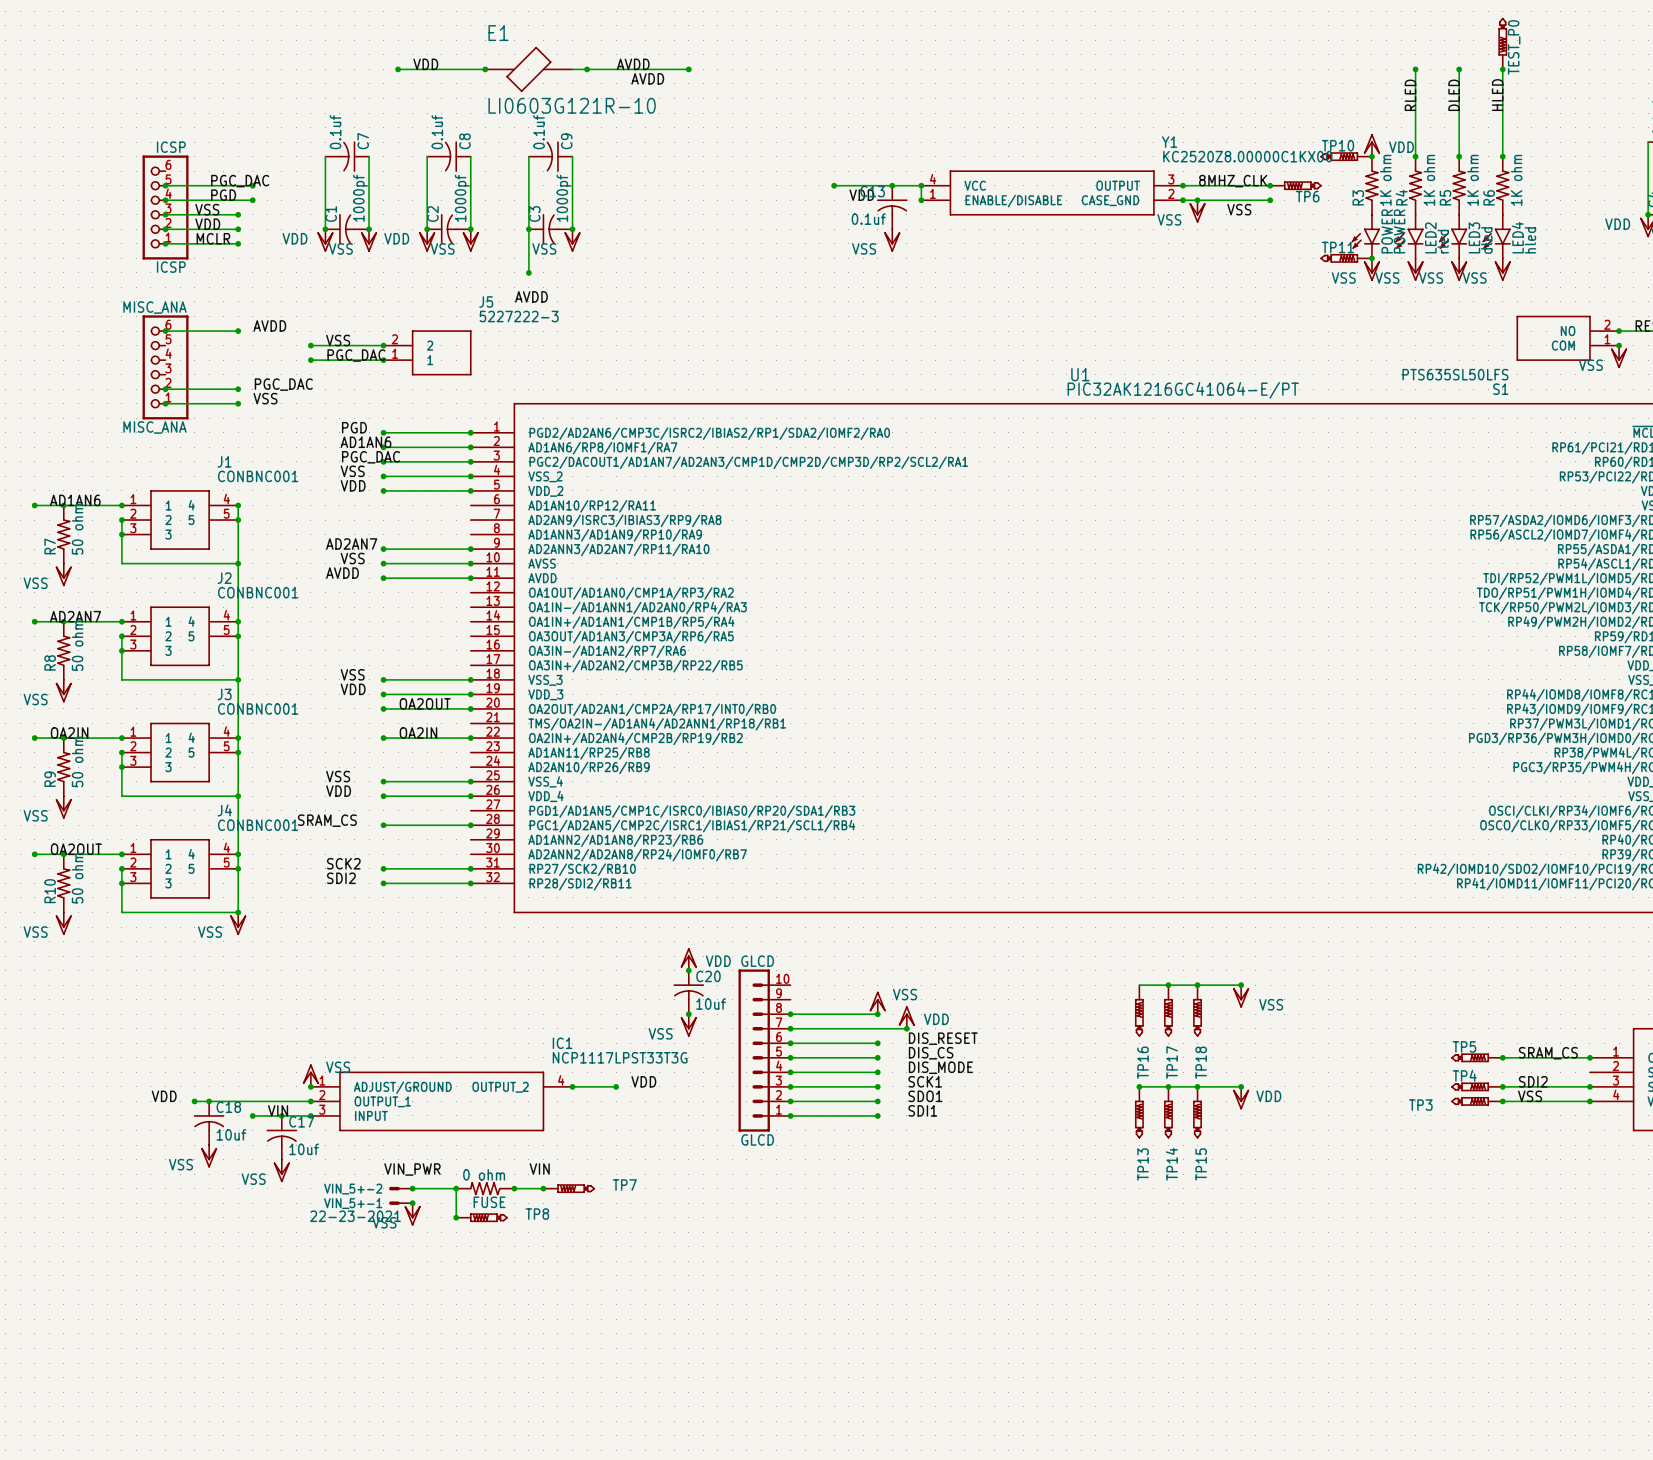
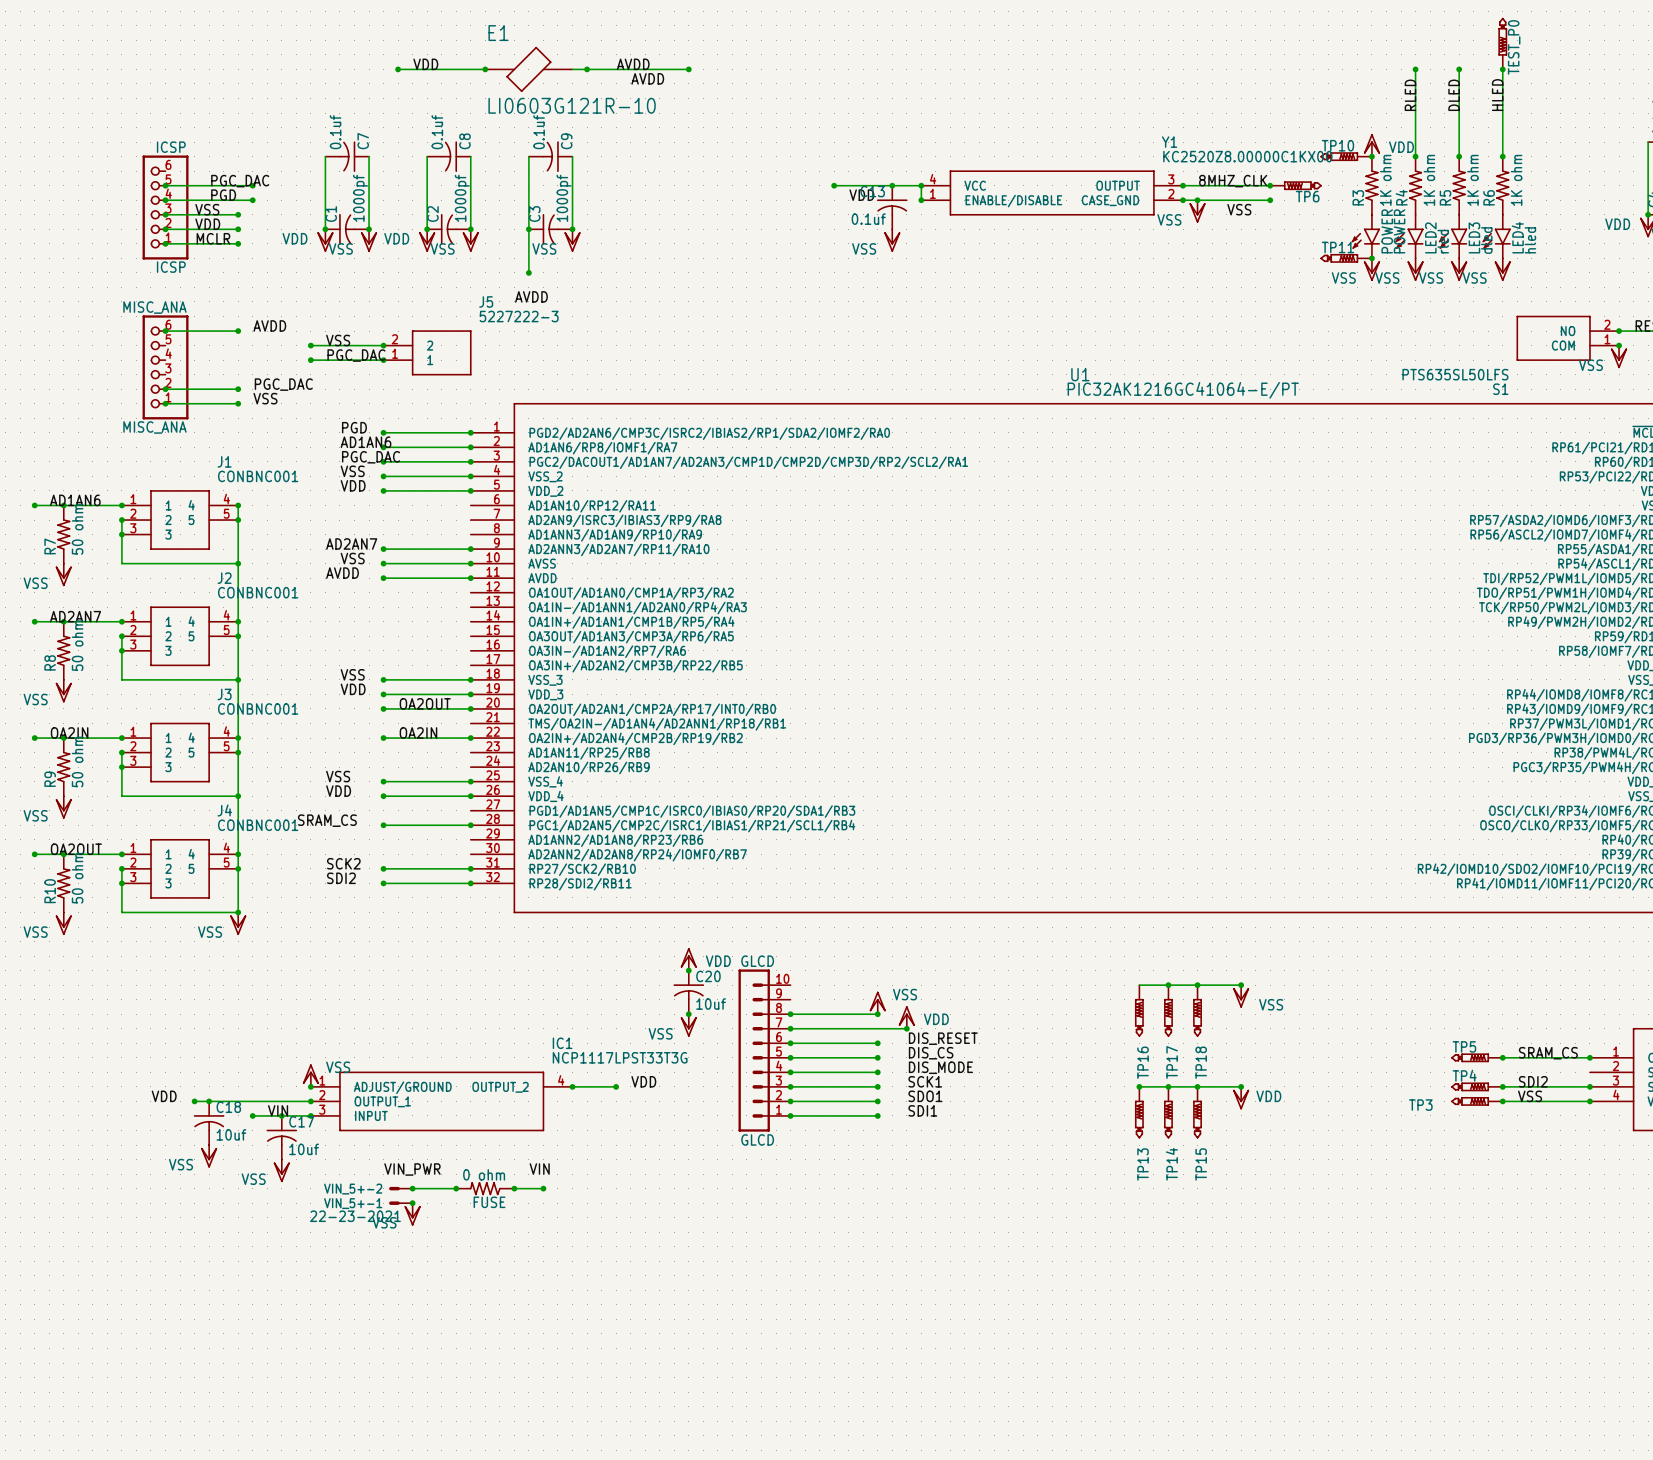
wire: (456, 1188) (456, 1217) -> none
TP7: (569, 1188) -> none
junction: (456, 1217) -> none
TP8: (481, 1217) -> none

